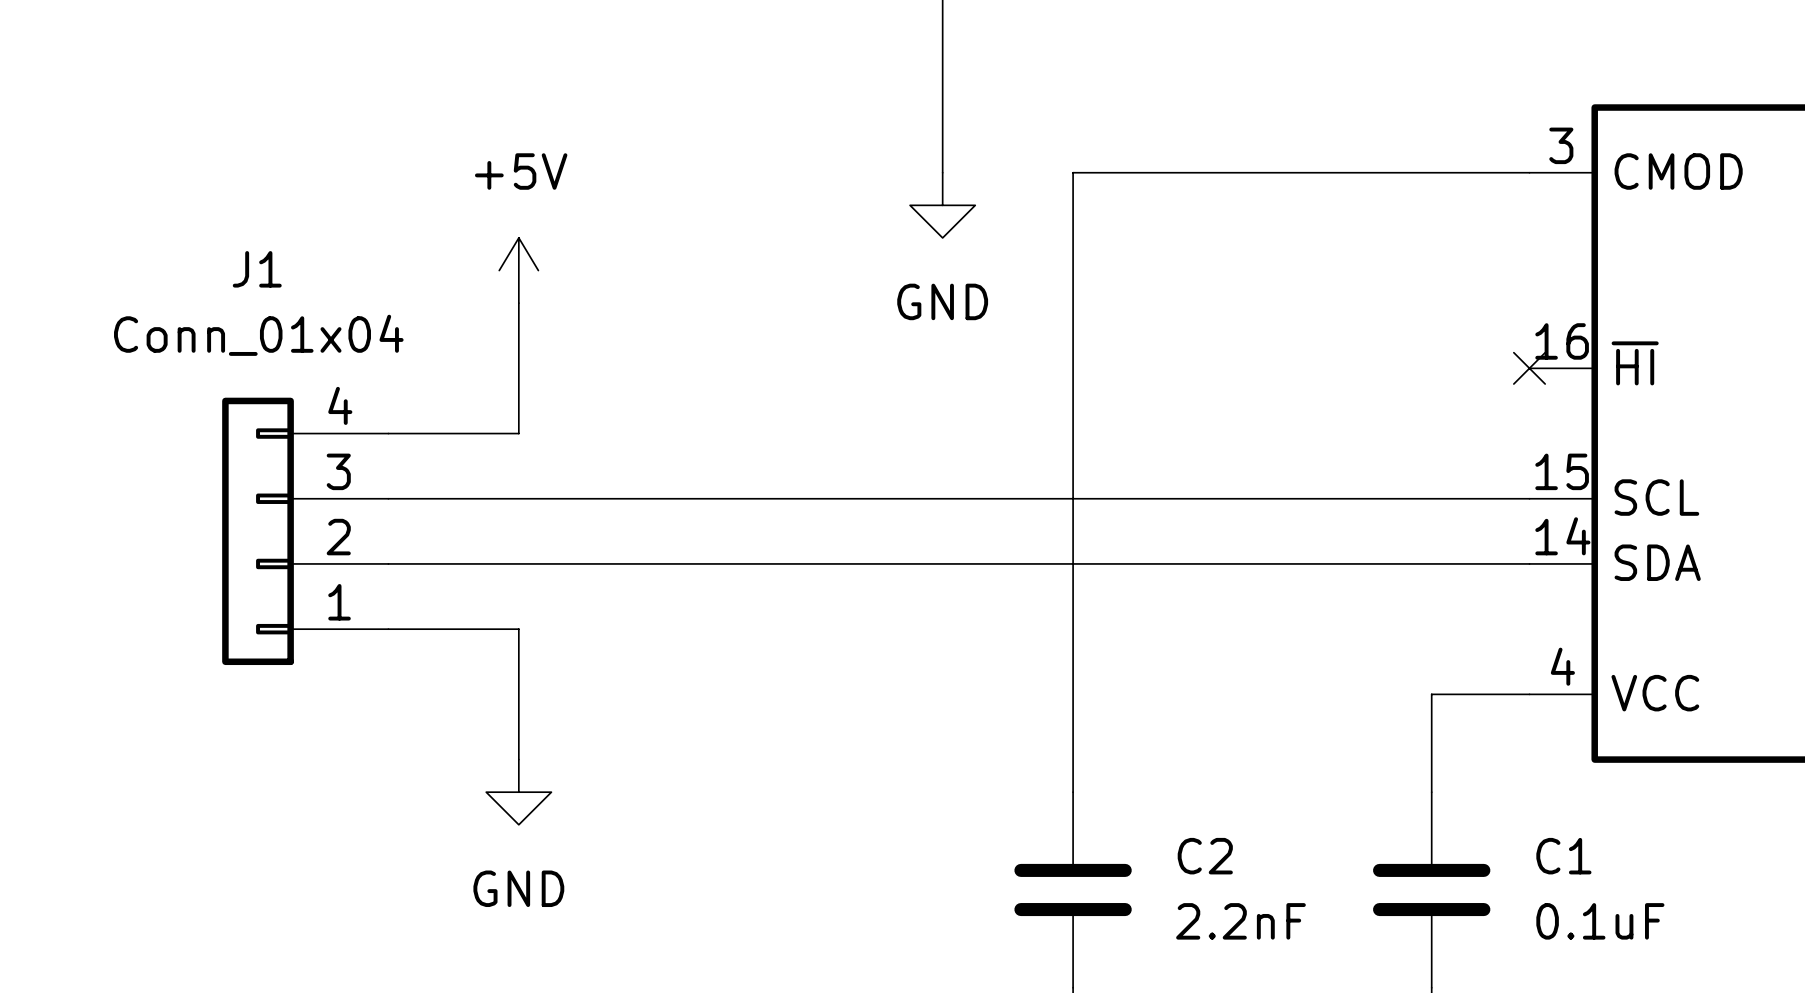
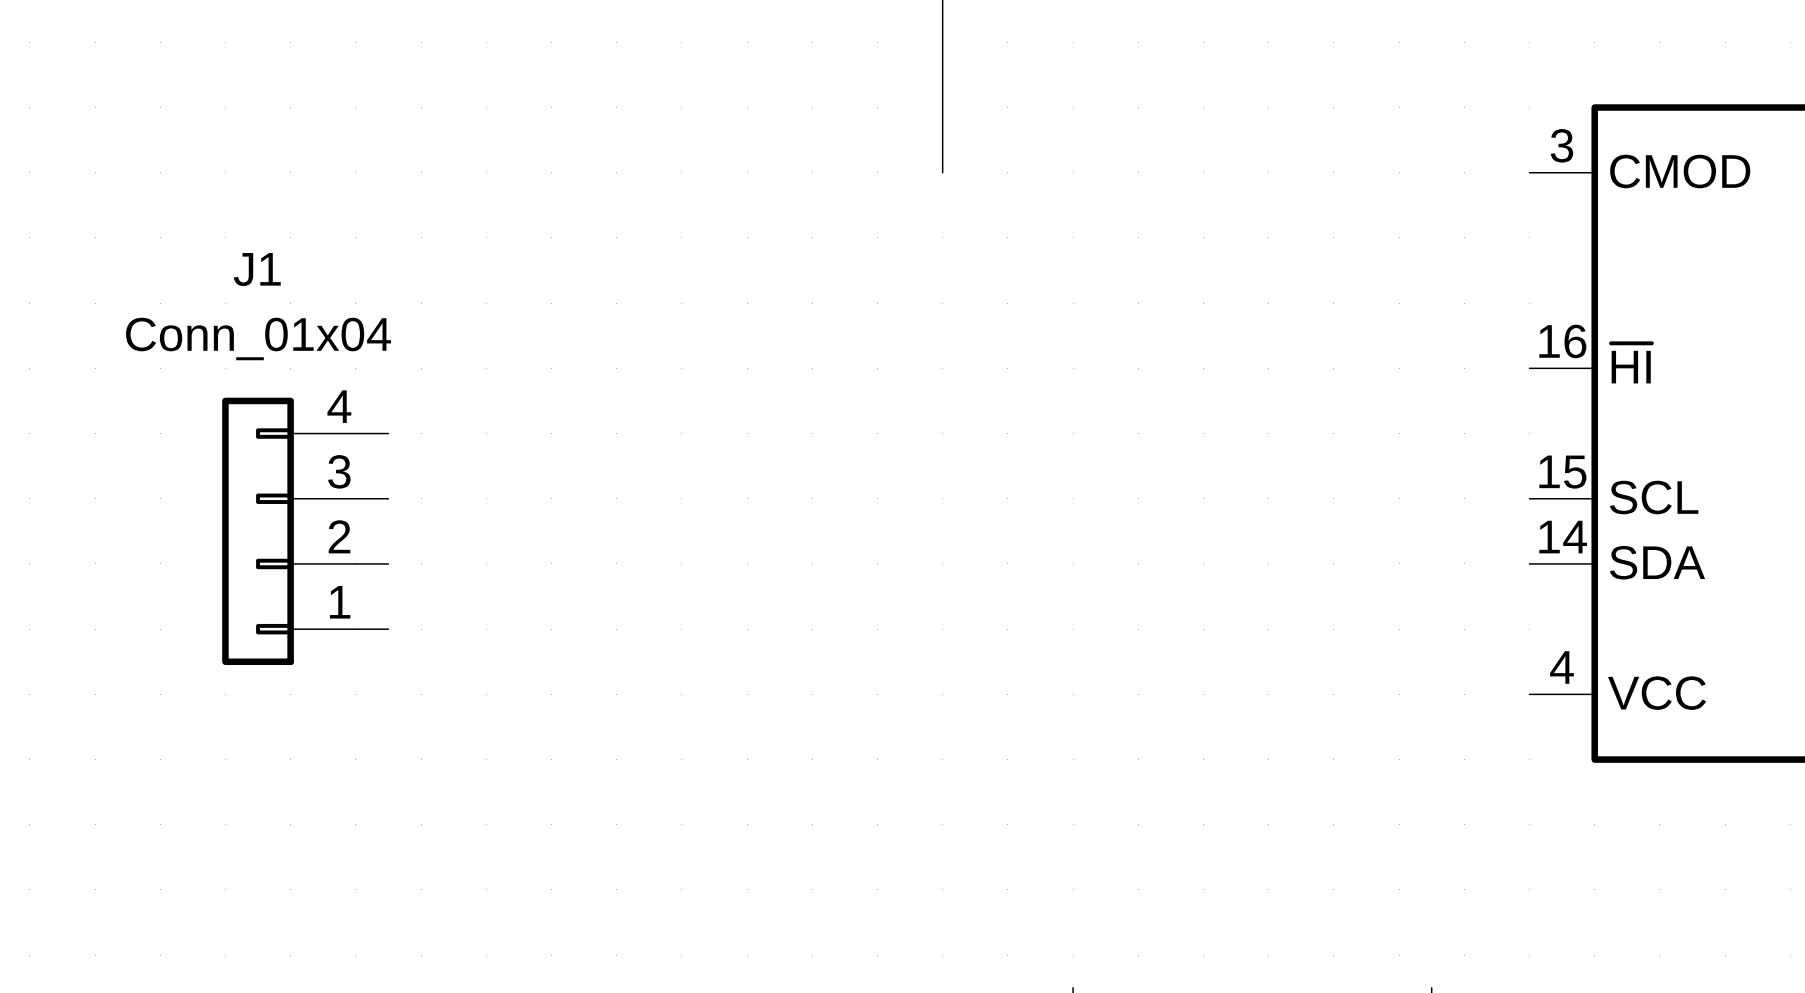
wire: (1529, 172) (1073, 172) (1073, 792) -> none
power symbol: GND (942, 205) -> none
power symbol: +5V (518, 270) -> none
wire: (518, 303) (518, 433) (388, 433) -> none
no-connect mark: (1529, 368) -> none
wire: (388, 498) (1529, 498) -> none
wire: (388, 563) (1529, 563) -> none
wire: (388, 629) (518, 629) (518, 759) -> none
wire: (1529, 694) (1431, 694) (1431, 792) -> none
power symbol: GND (518, 792) -> none
C2: 2.2nF (1073, 889) -> none
C1: 0.1uF (1431, 889) -> none

